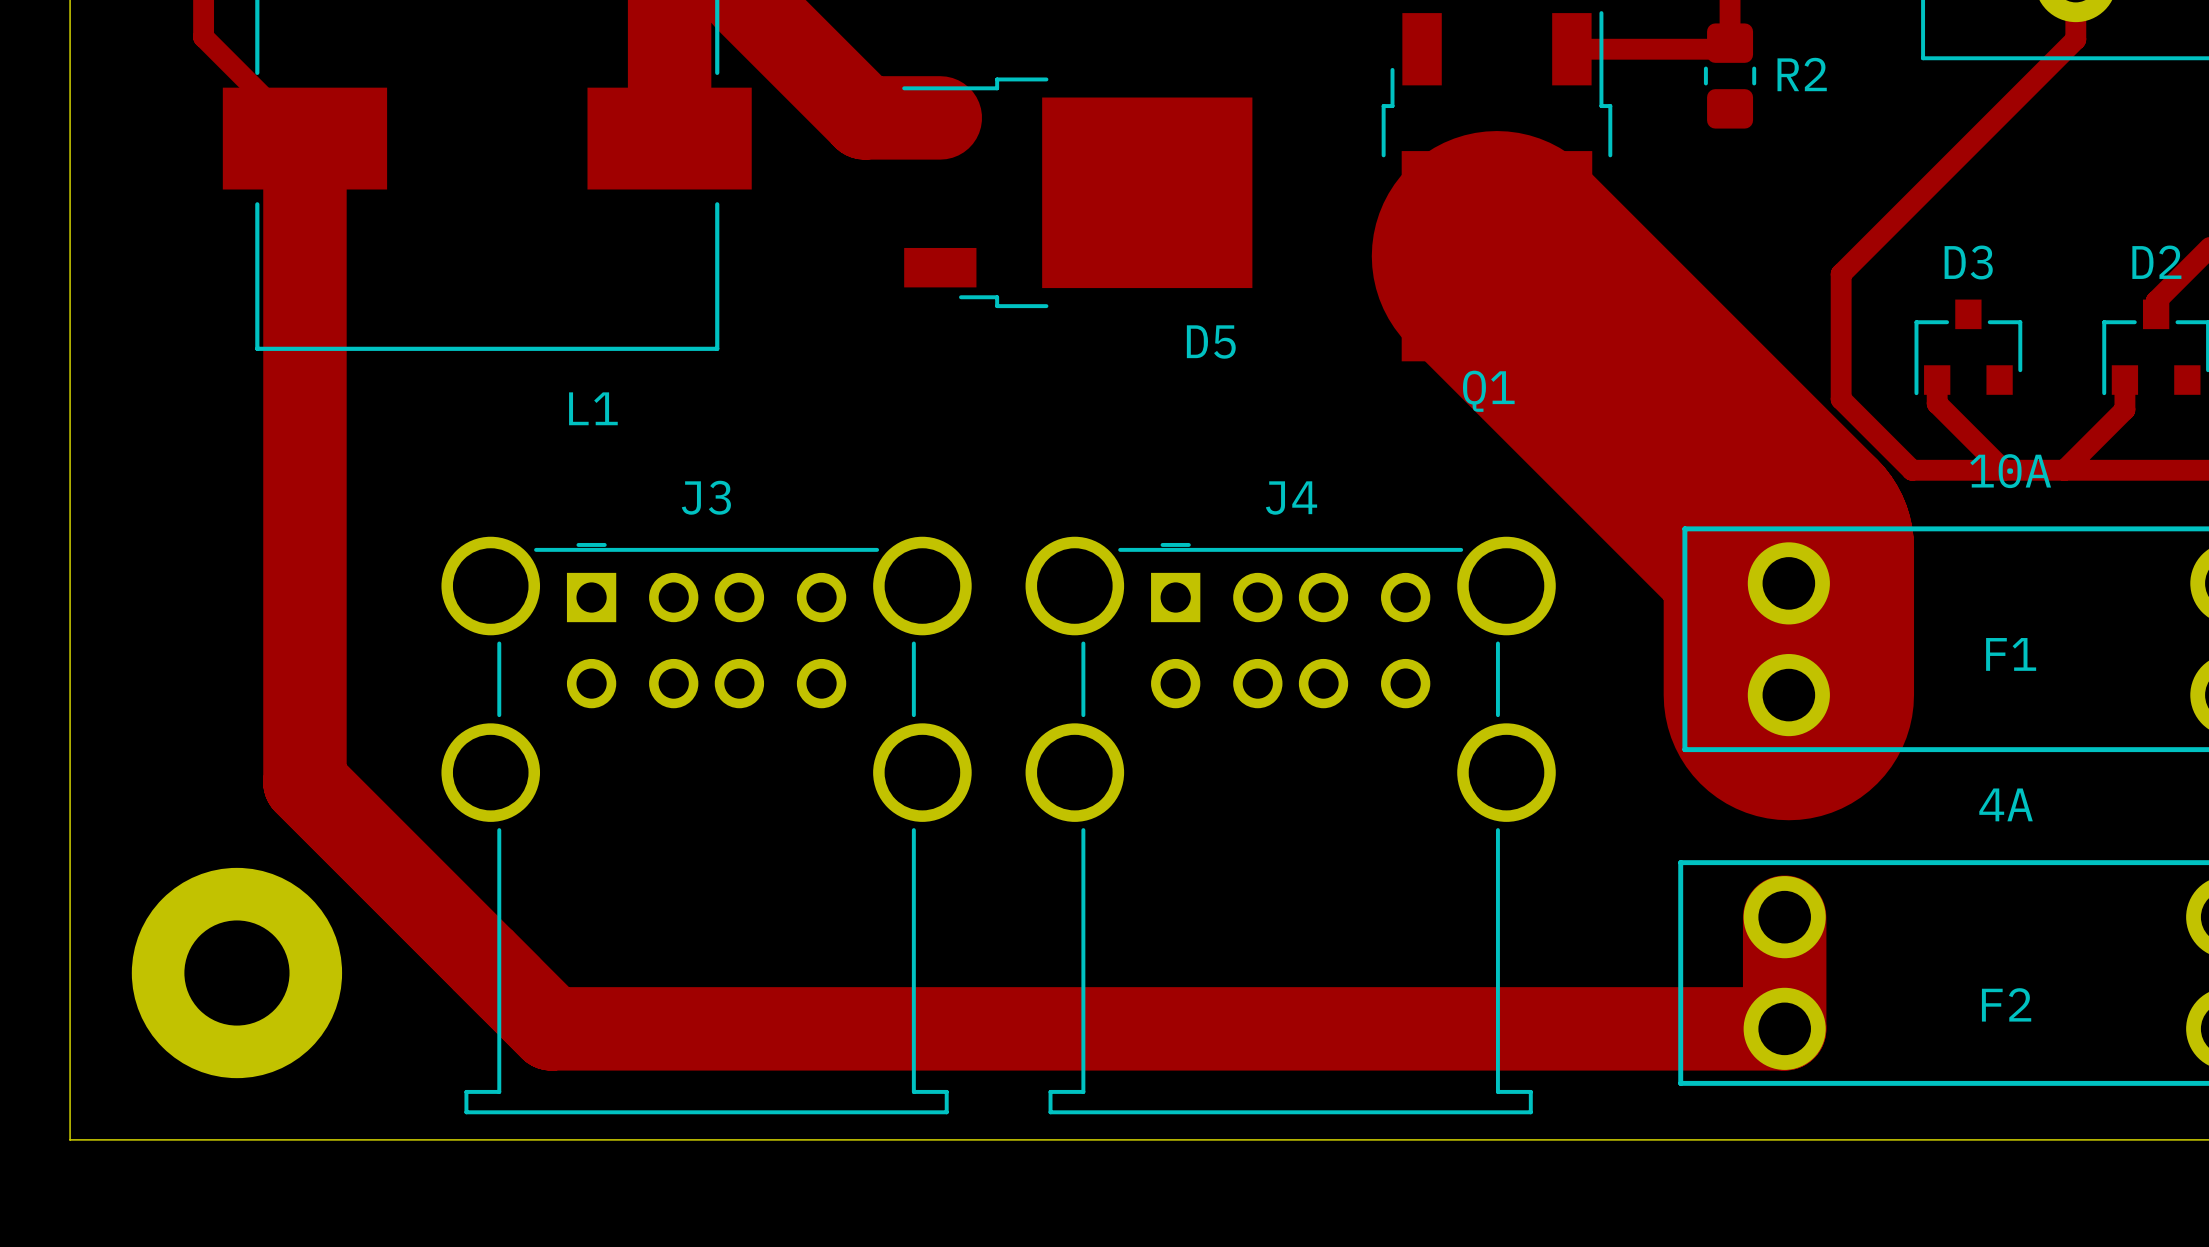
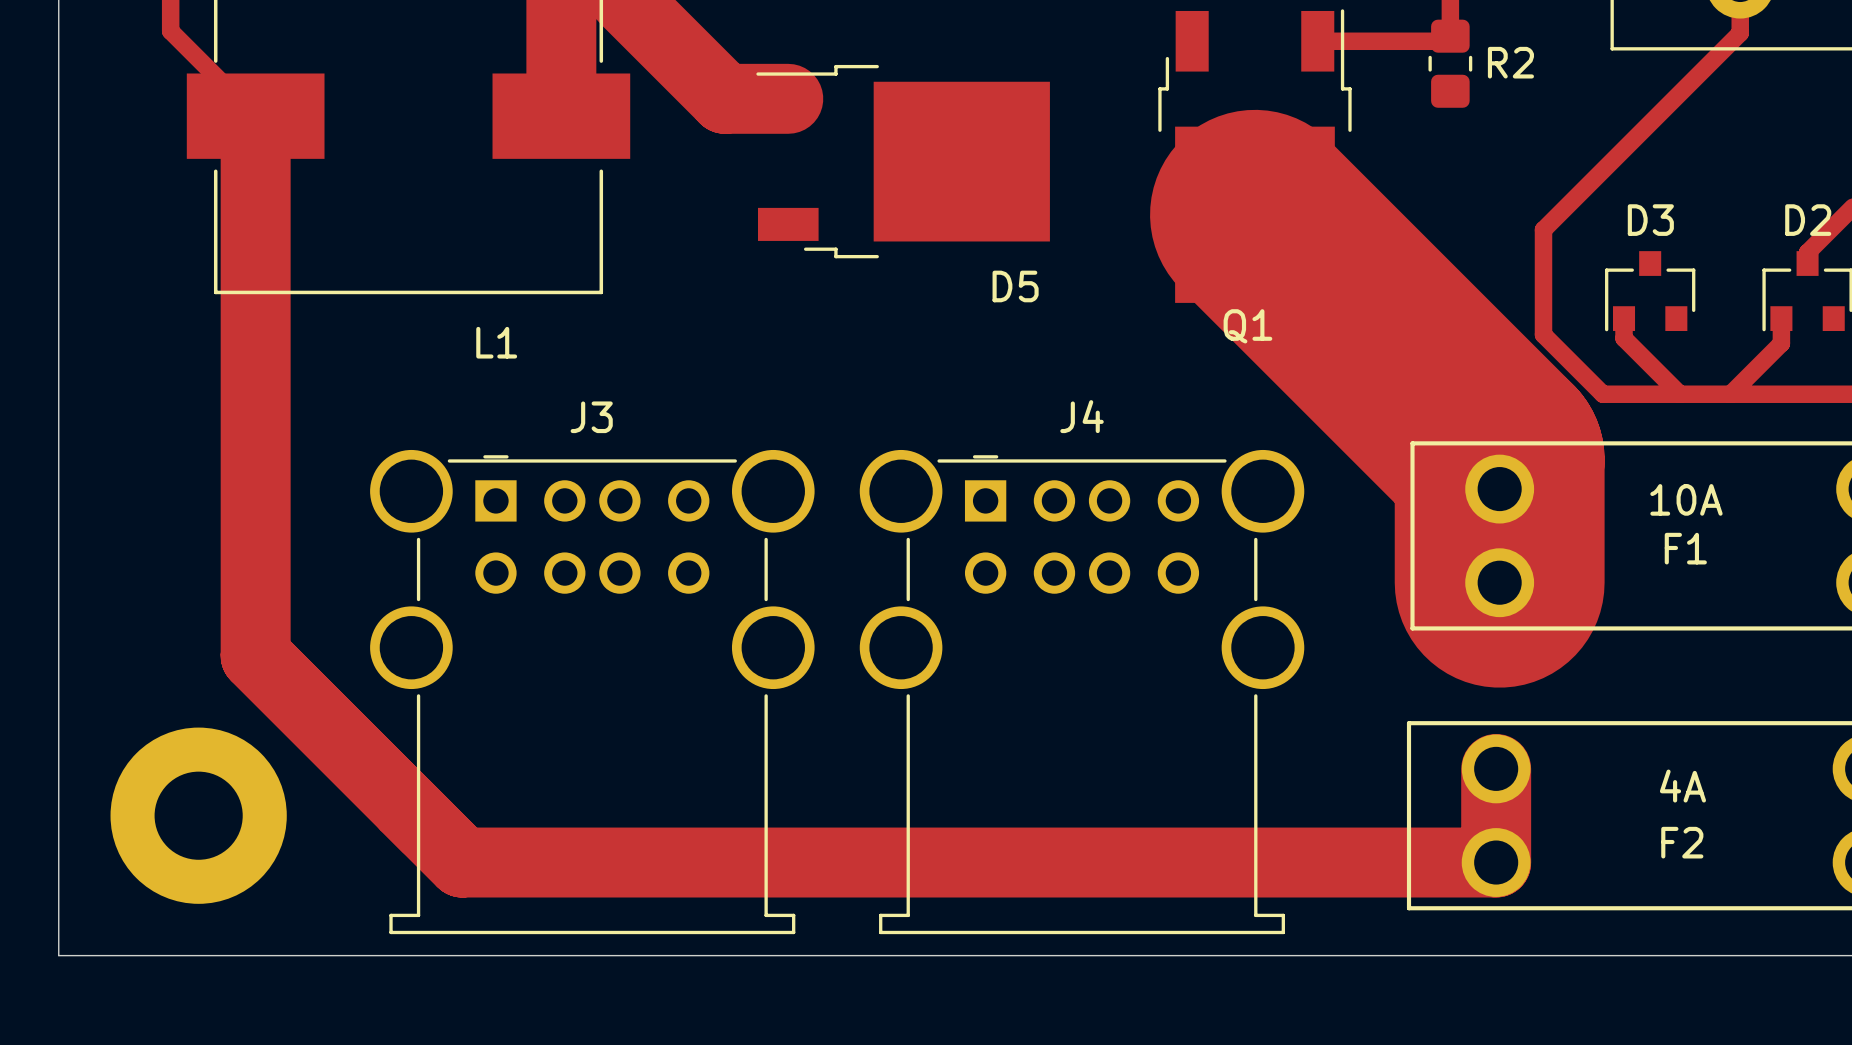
F1 value position: 10A (2010, 471) -> 10A (1686, 499)
F2 value position: 4A (2006, 804) -> 4A (1682, 786)

